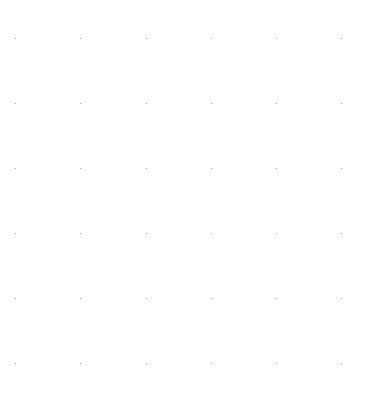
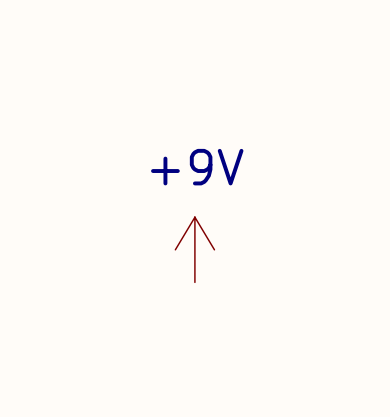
power symbol: none -> +9V (194, 249)

